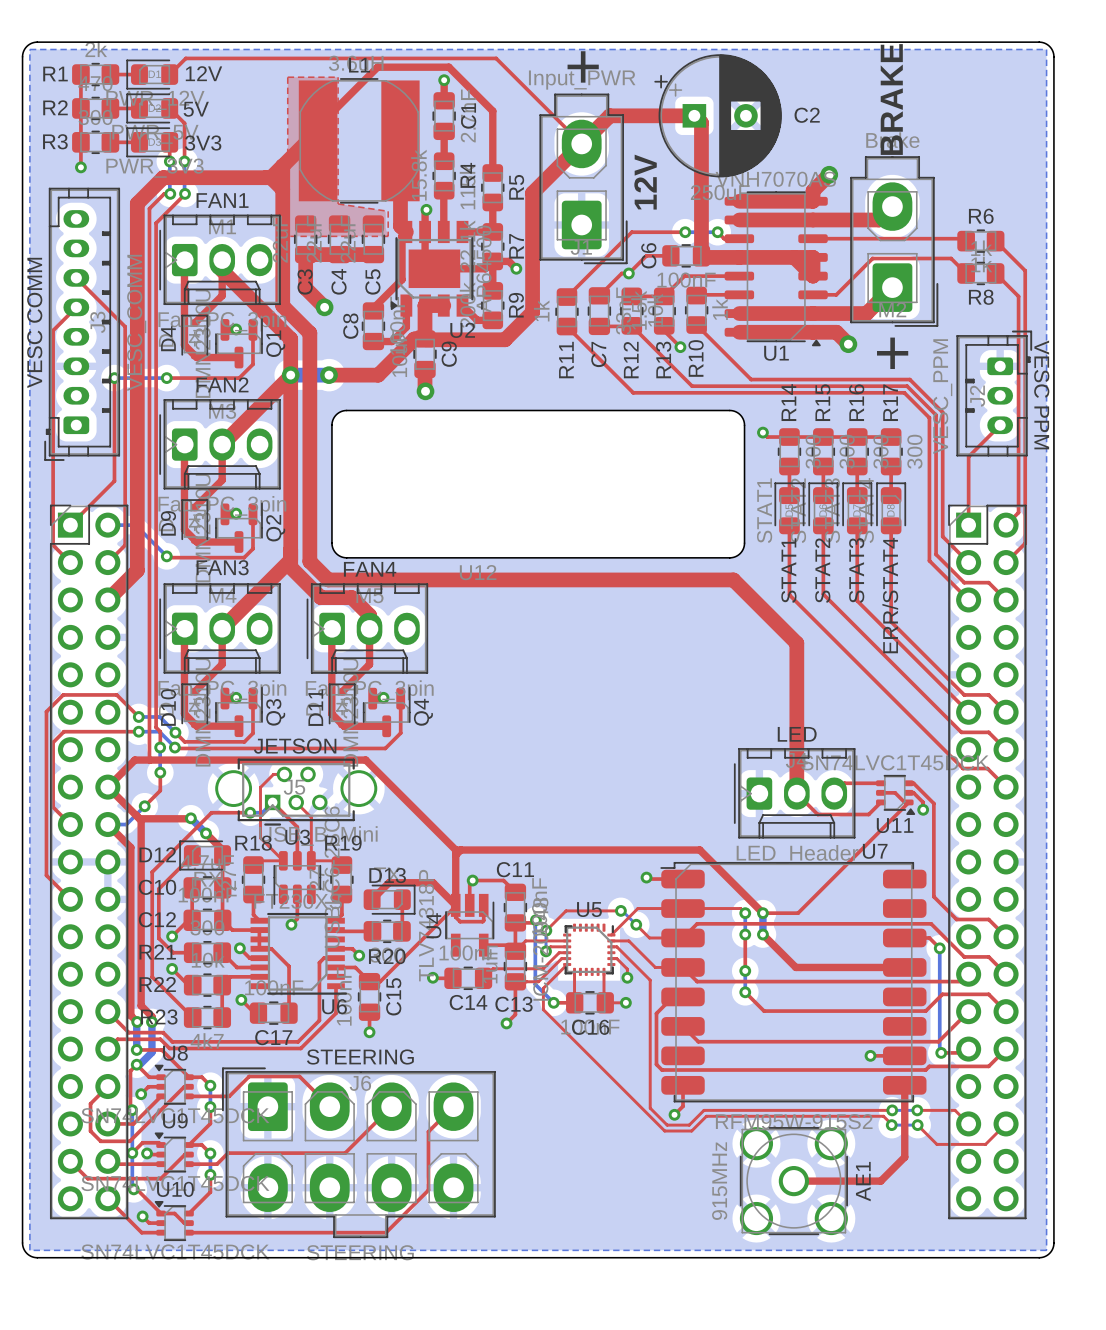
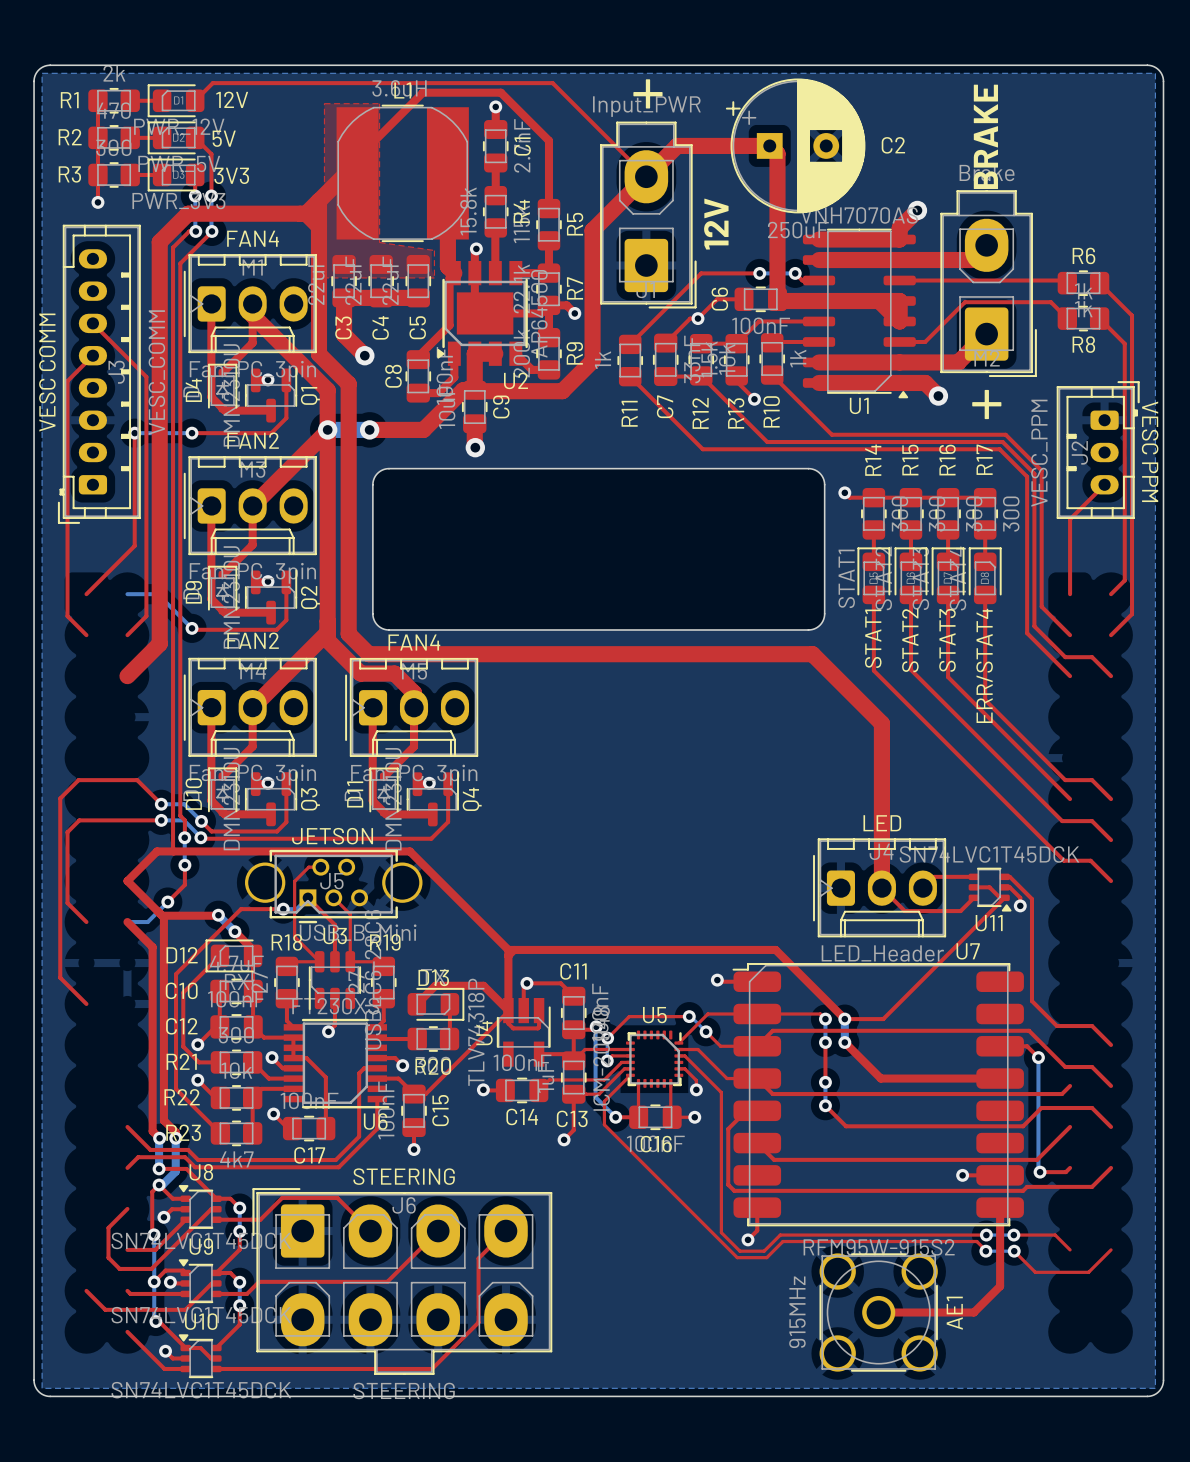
text: FAN1 (222, 200) -> FAN4 (253, 238)
text: FAN3 (222, 567) -> FAN2 (253, 640)
part: (538, 649) -> none

